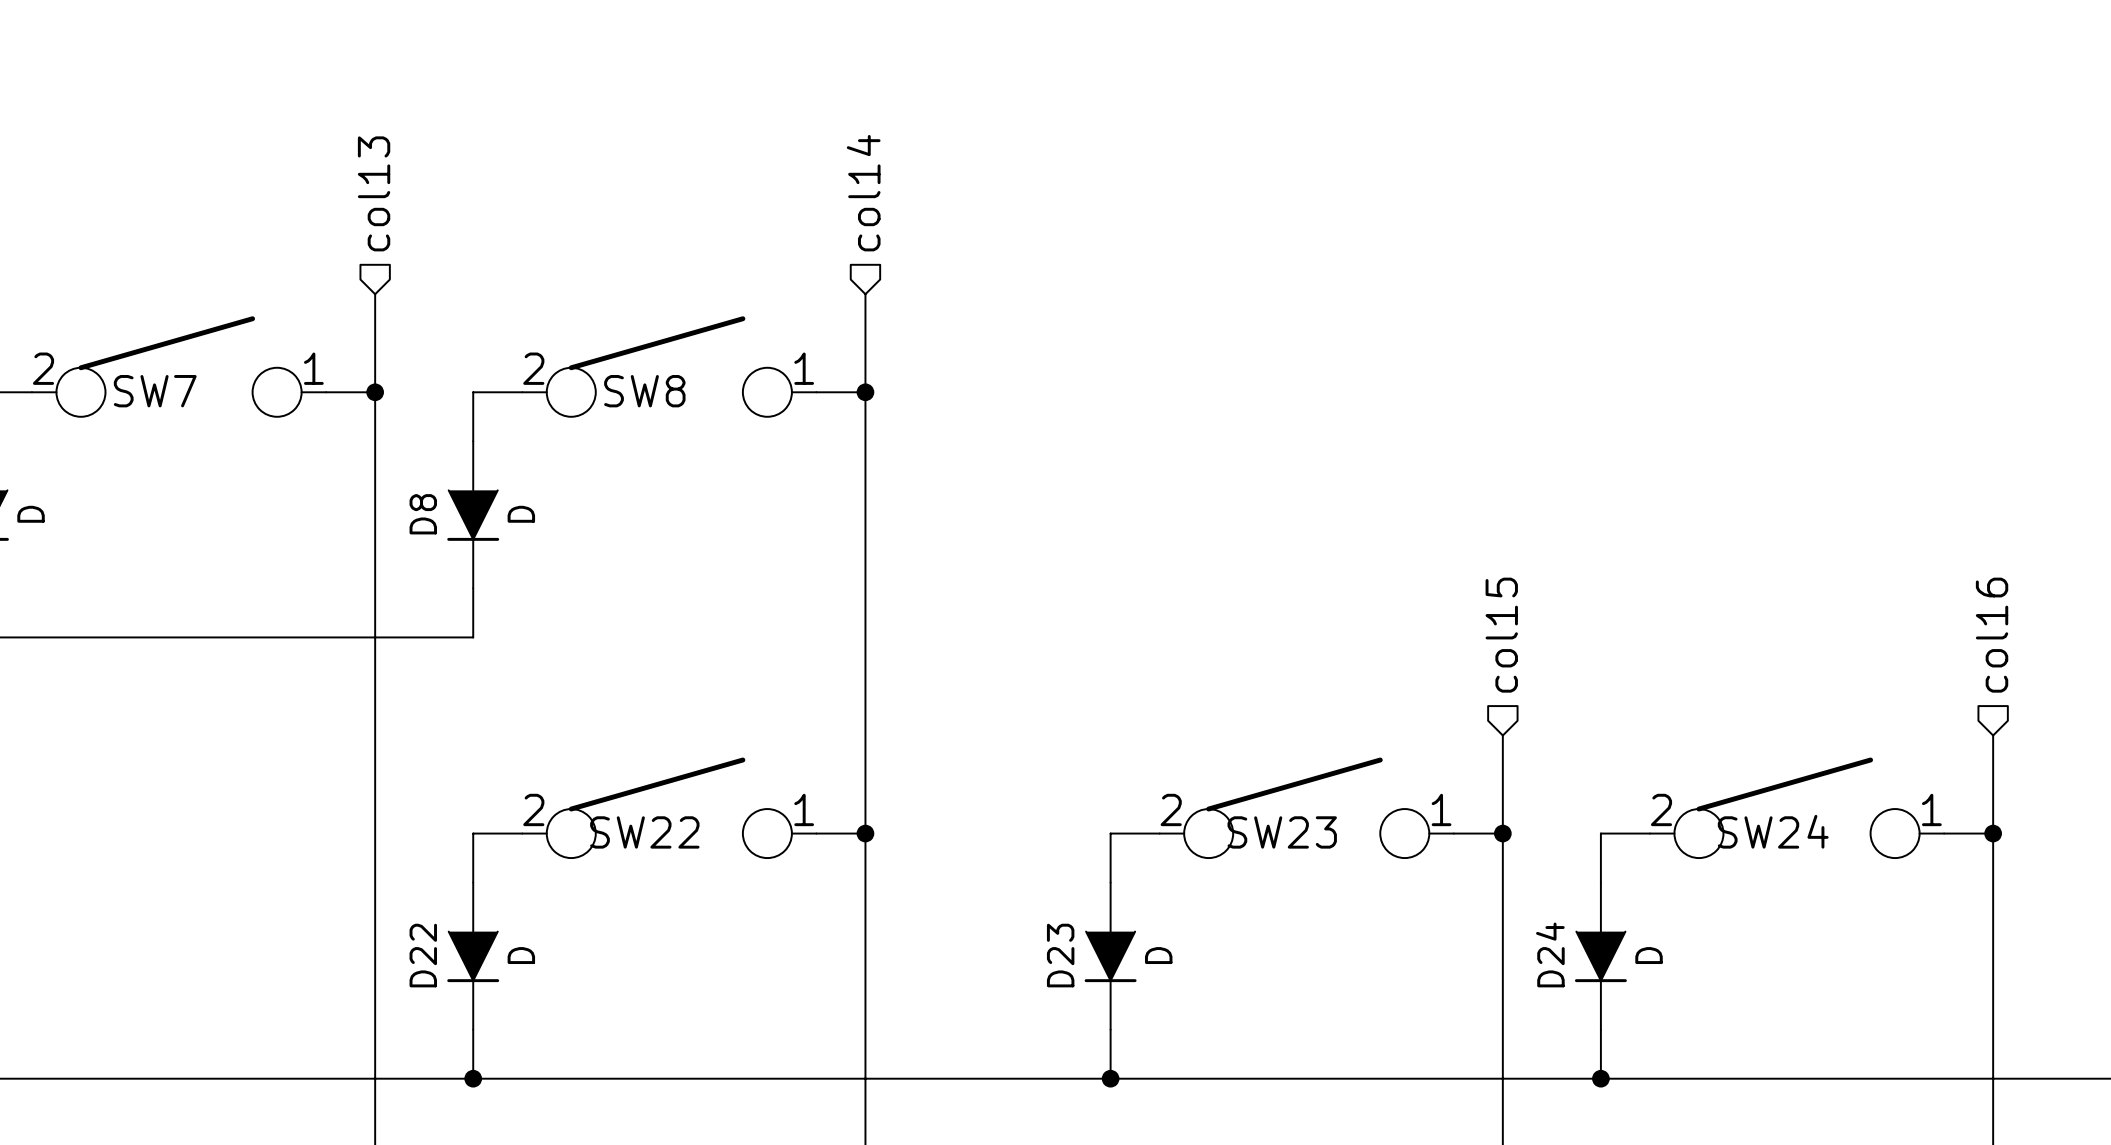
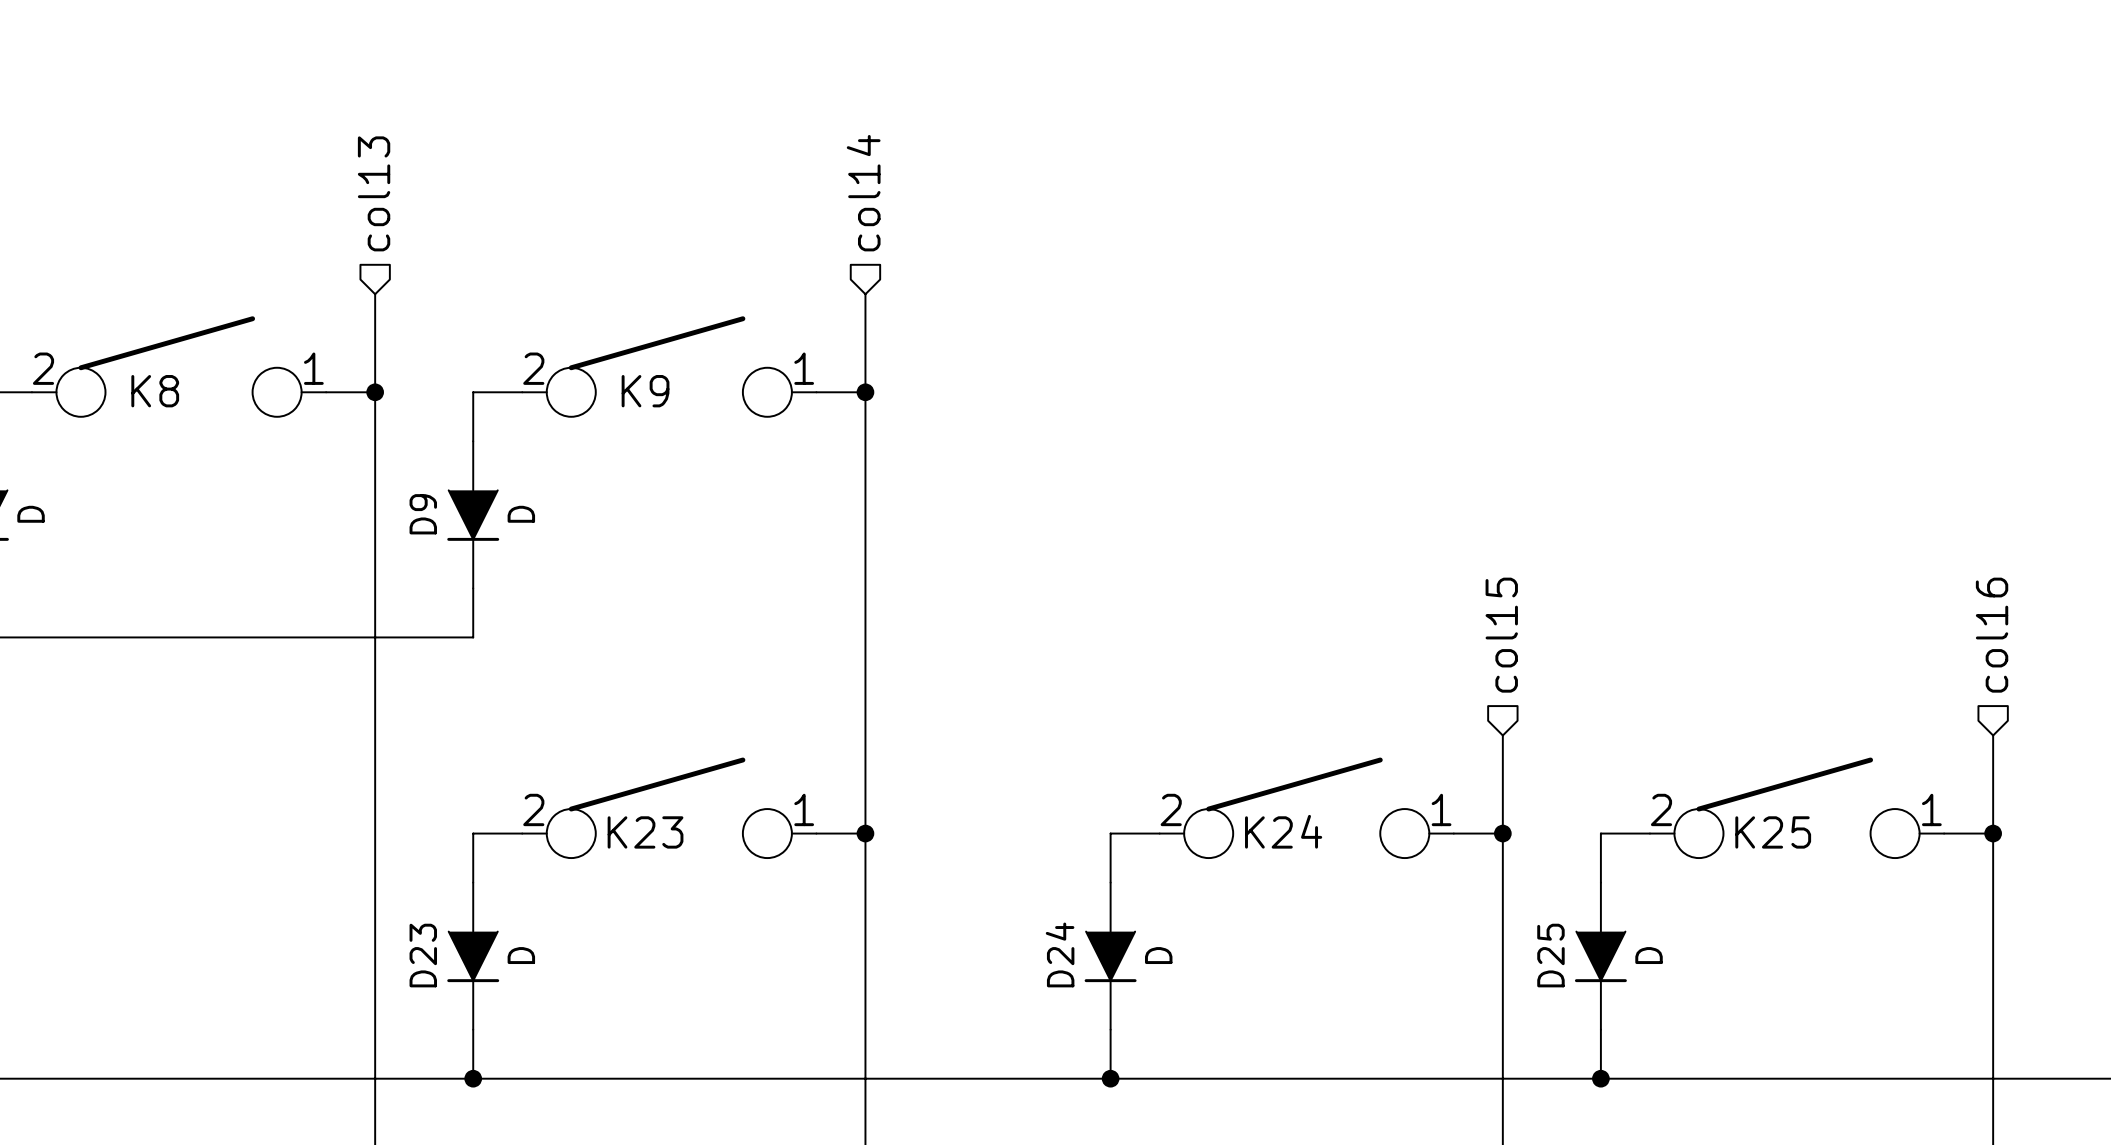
SW7 name: SW7 (155, 391) -> K8 (155, 391)
SW8 name: SW8 (644, 391) -> K9 (645, 391)
D8 name: D8 (423, 514) -> D9 (423, 514)
SW24 name: SW24 (1773, 831) -> K25 (1773, 832)
SW22 name: SW22 (644, 832) -> K23 (645, 832)
SW23 name: SW23 (1282, 832) -> K24 (1283, 831)
D24 name: D24 (1550, 954) -> D25 (1550, 955)
D22 name: D22 (423, 955) -> D23 (423, 955)
D23 name: D23 (1060, 955) -> D24 (1060, 954)

